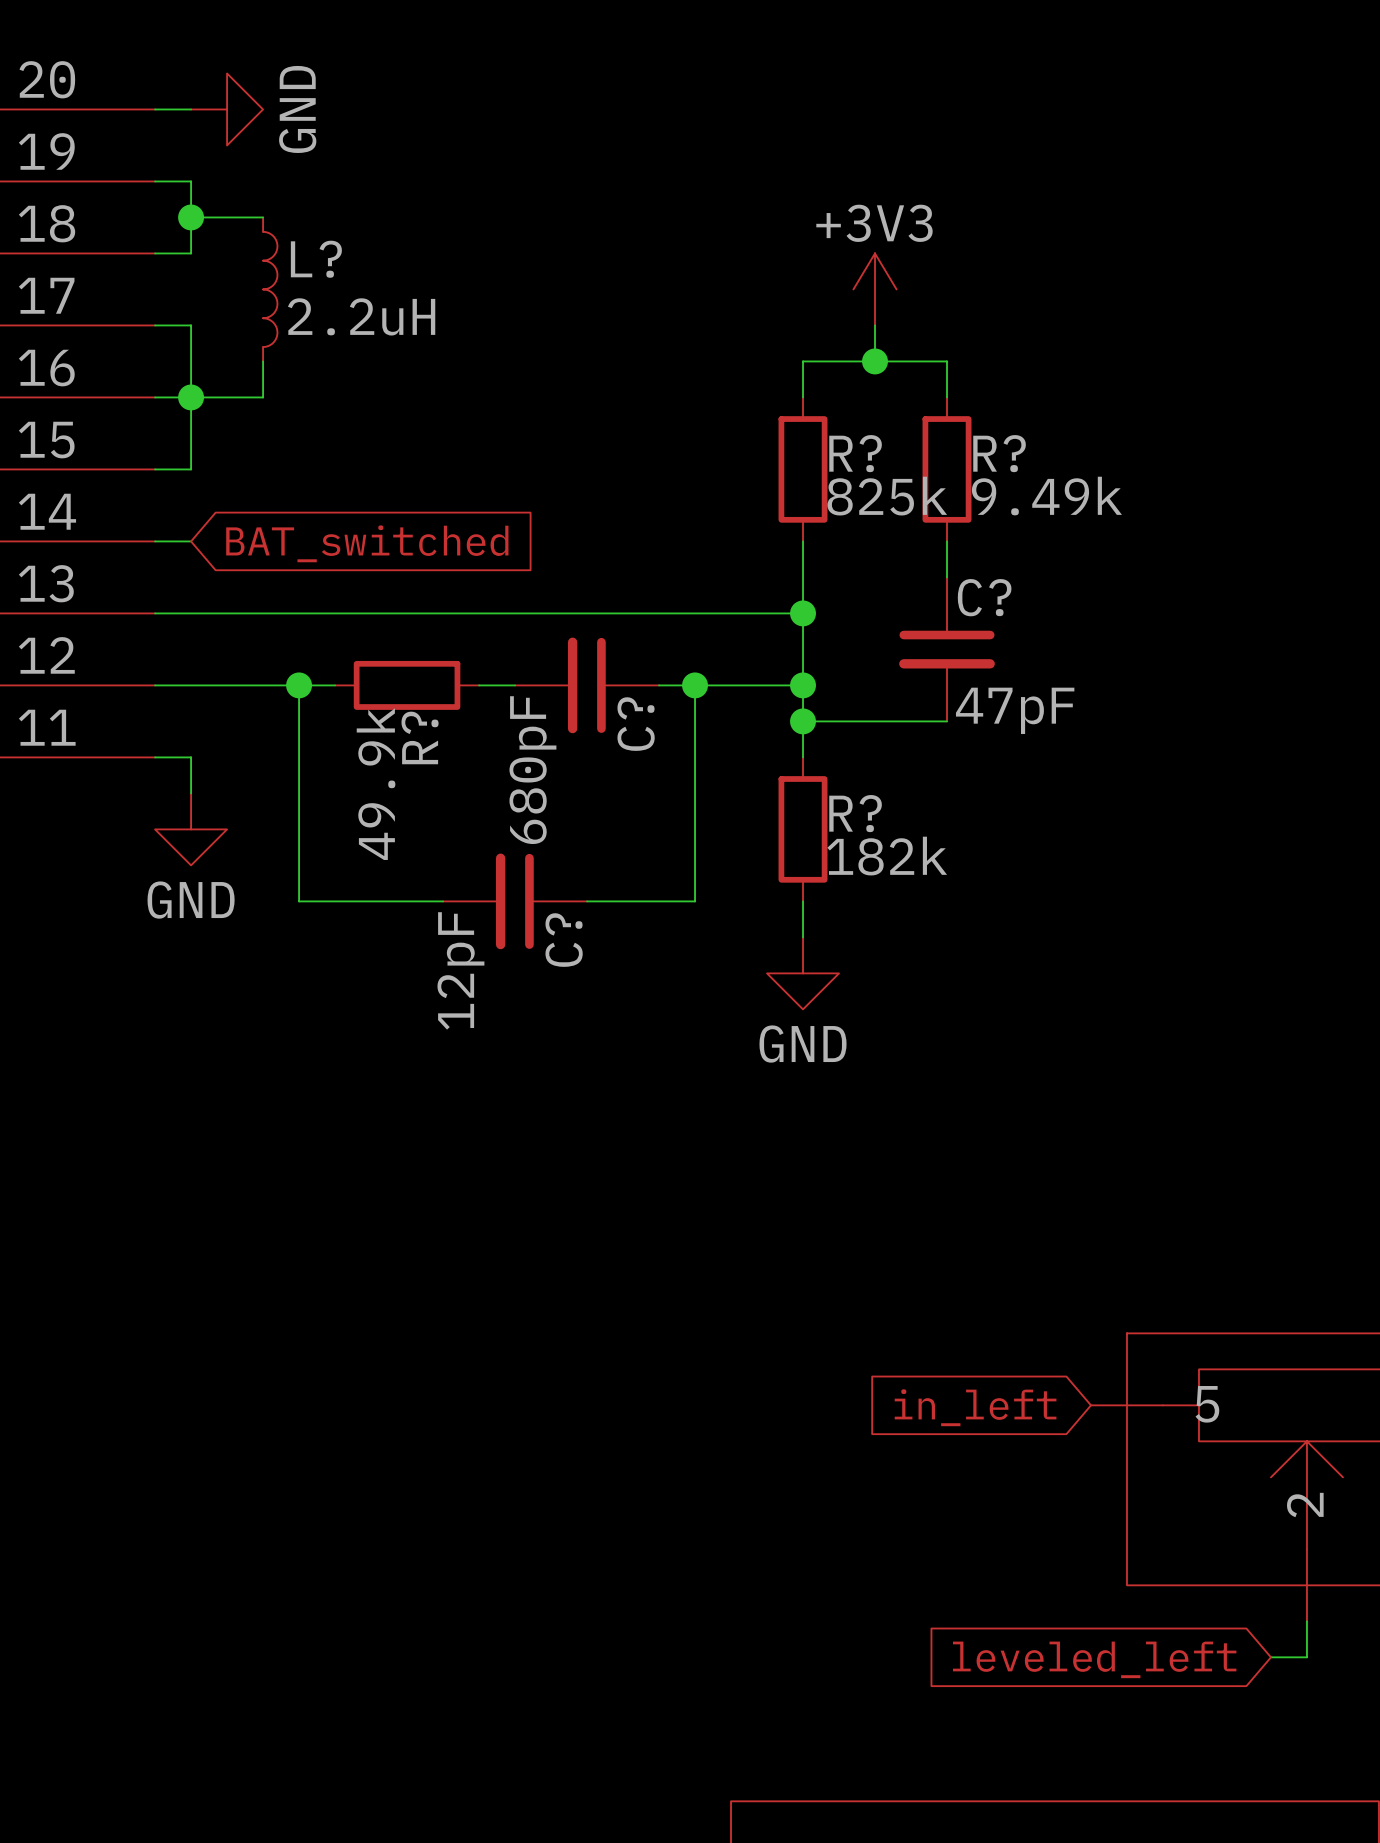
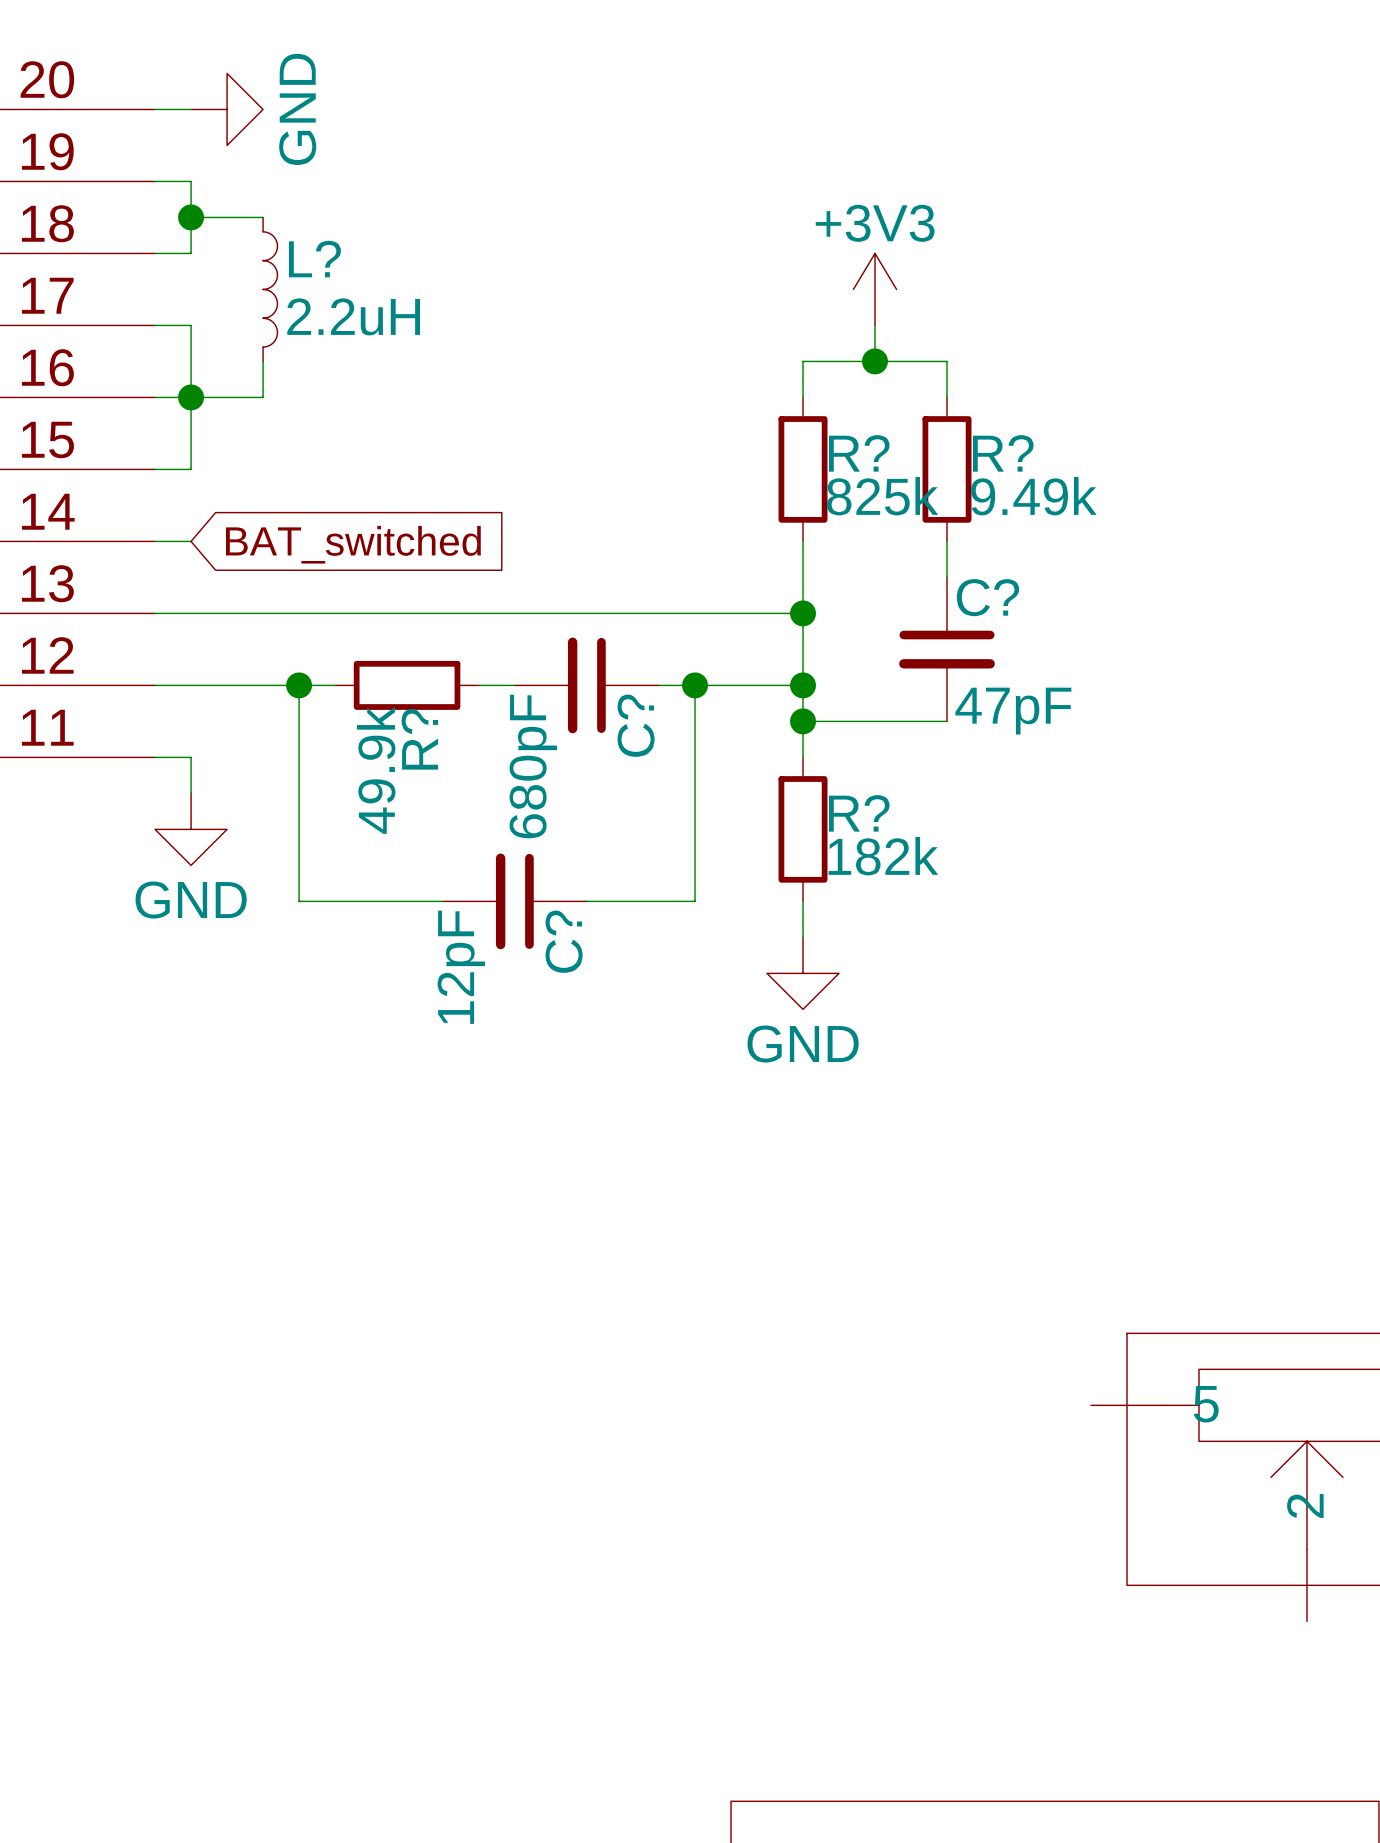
global label: in_left (975, 1407) -> none
wire: (1306, 1621) (1306, 1657) (1270, 1657) -> none
global label: leveled_left (1094, 1659) -> none

